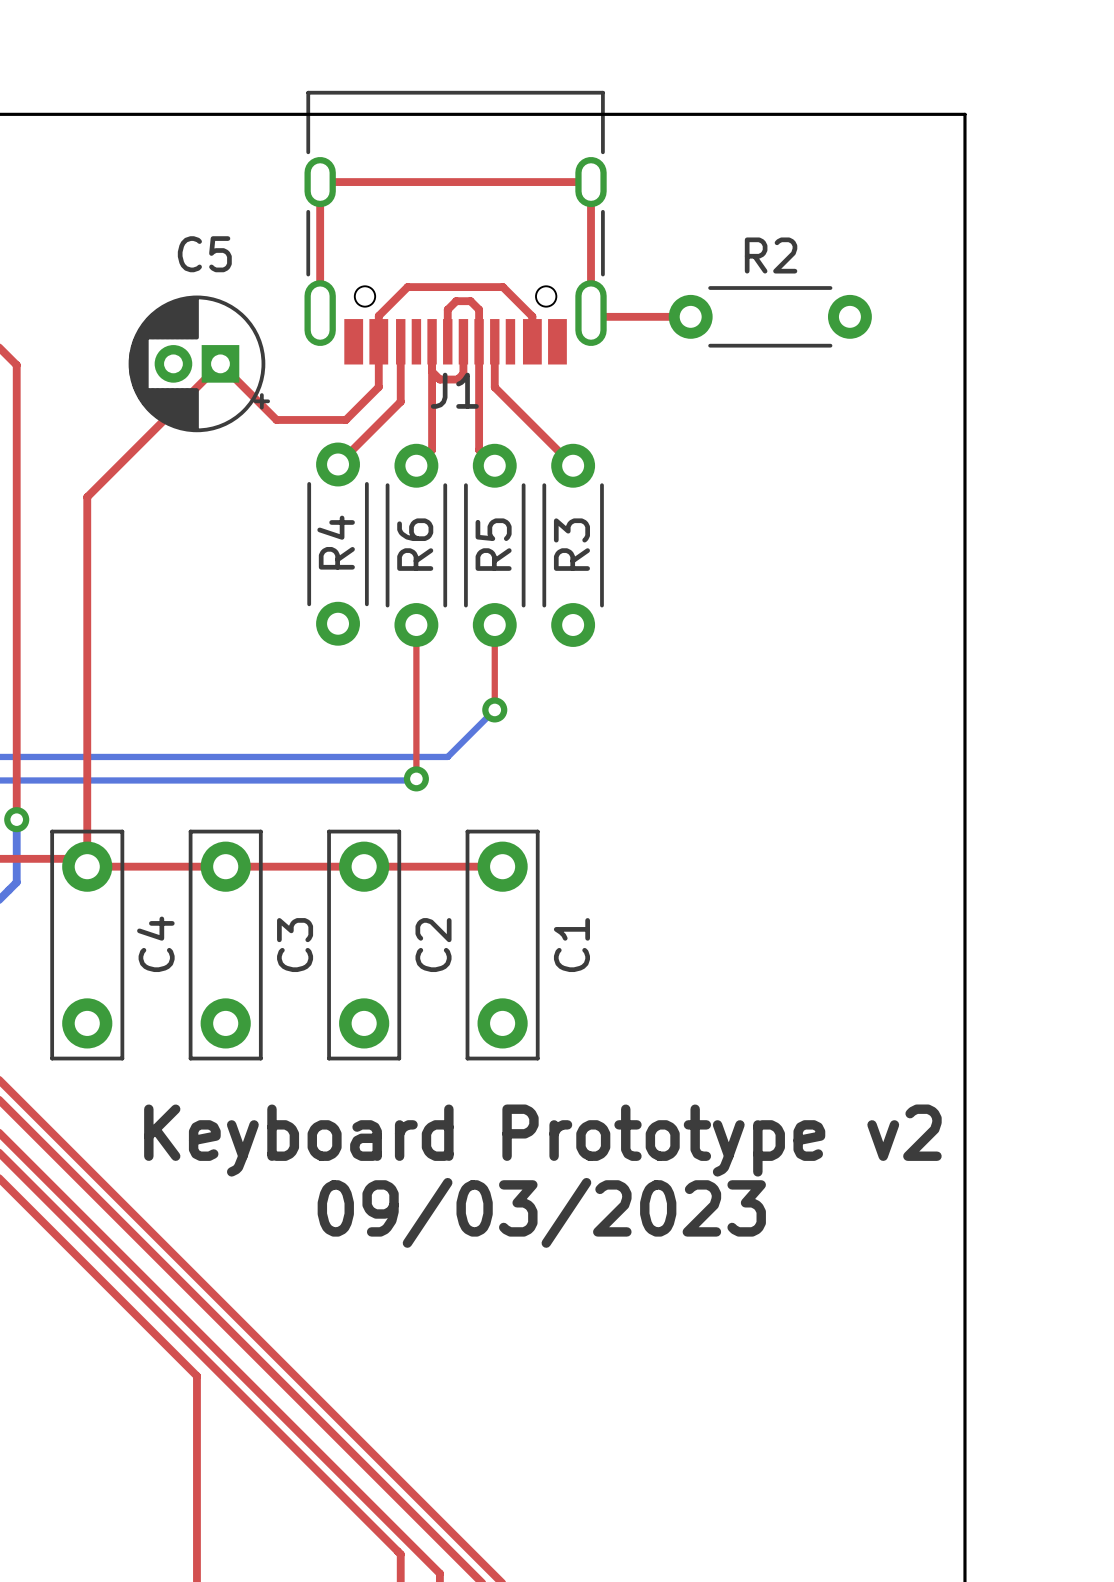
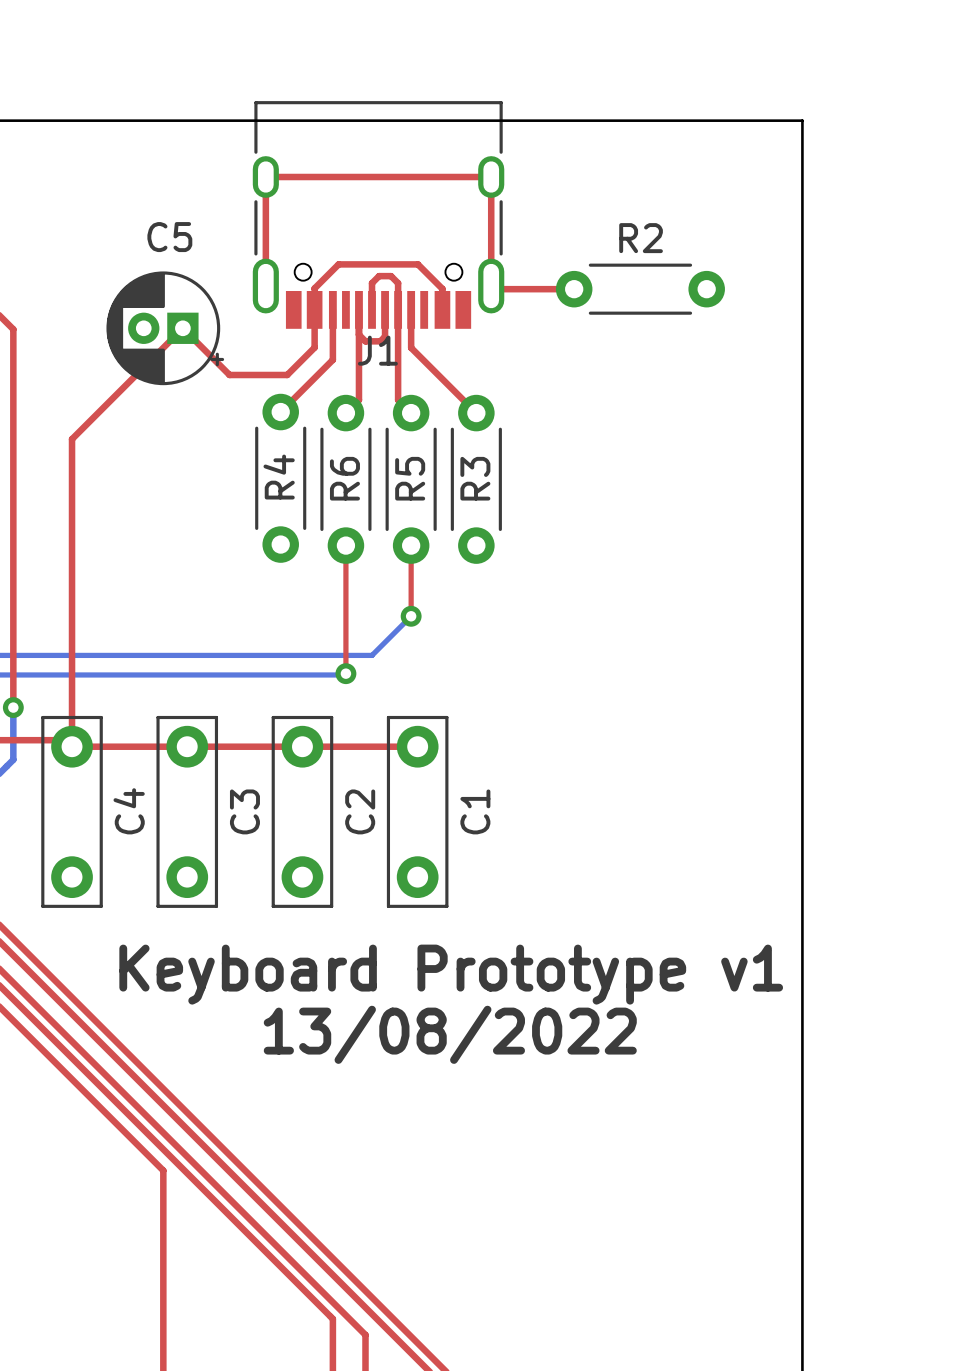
text: Keyboard Prototype v2 (542, 1140) -> Keyboard Prototype v1 (451, 974)
text: 09/03/2023 (541, 1212) -> 13/08/2022 (450, 1034)

